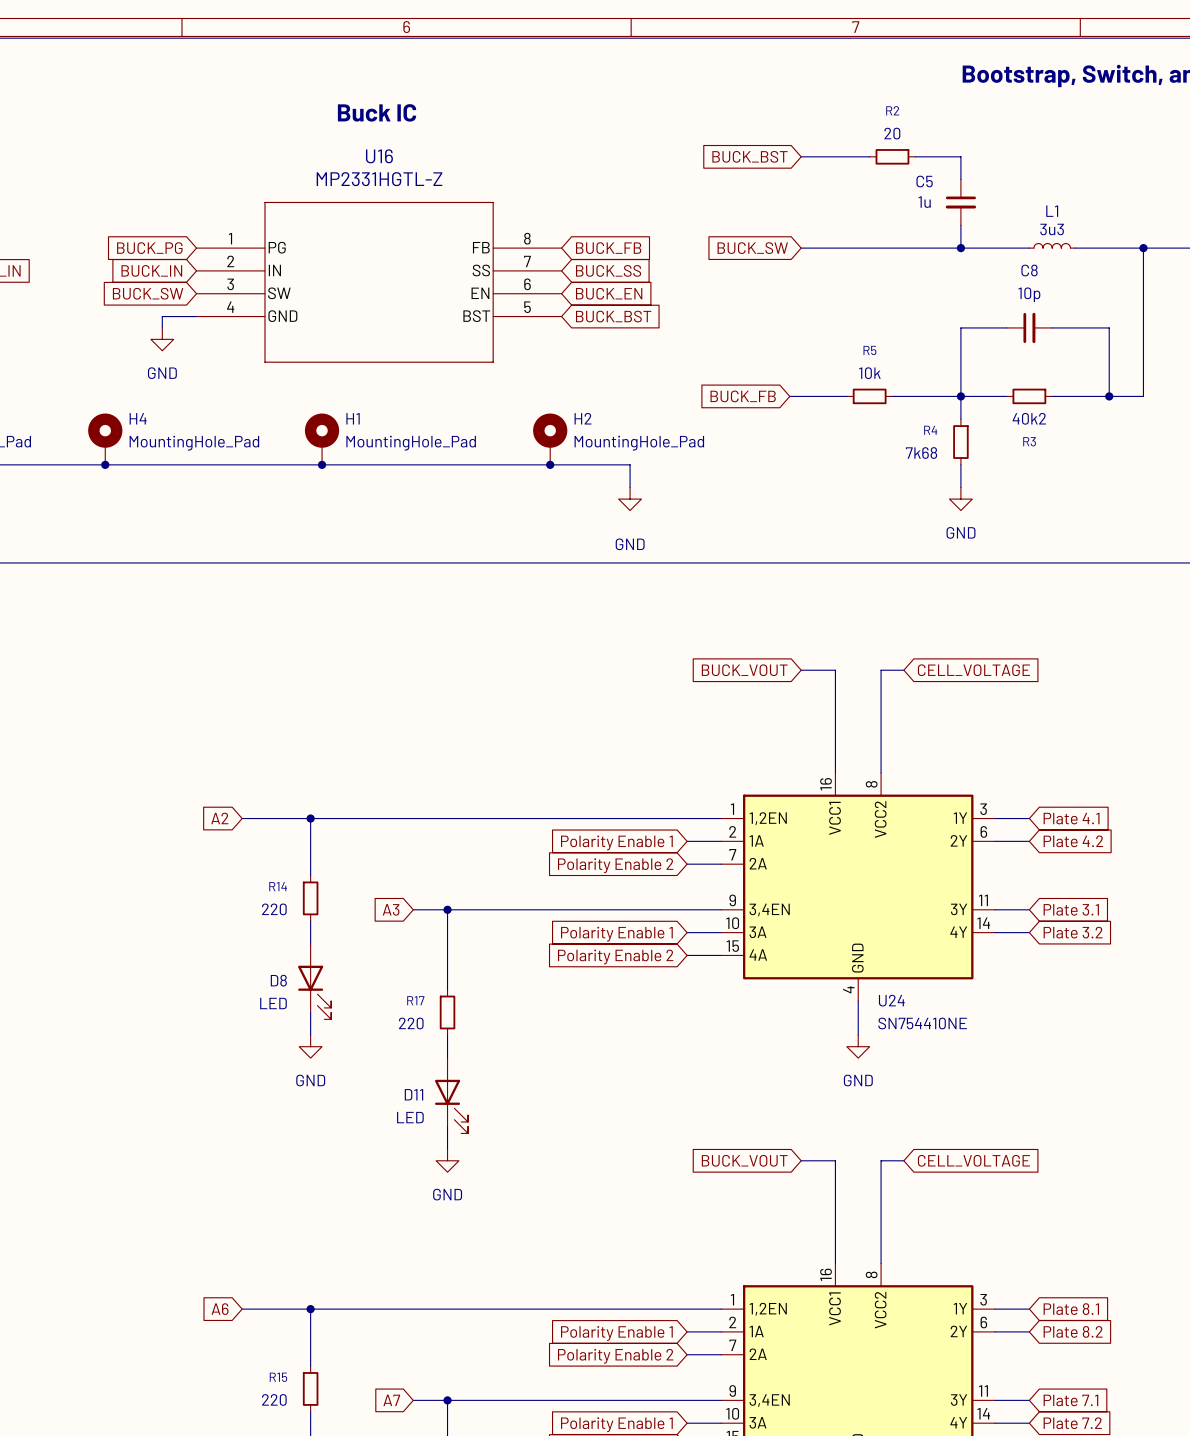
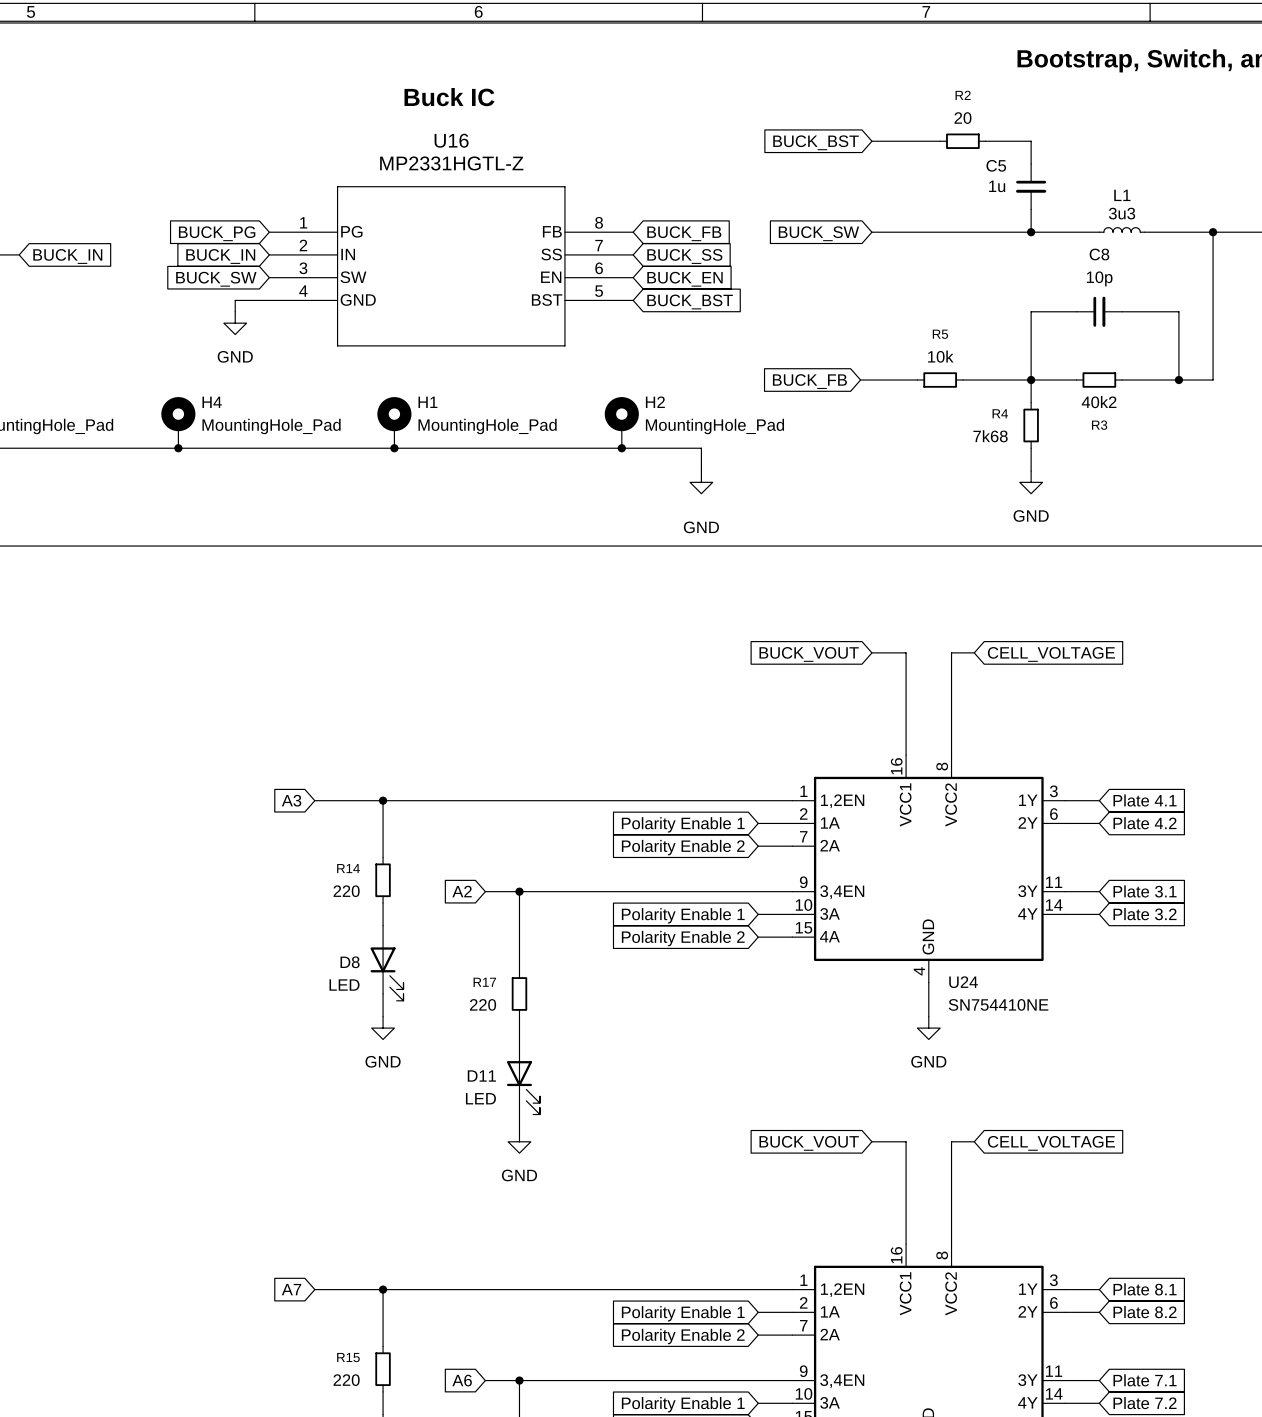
global label: A2 (219, 818) -> A3 (291, 800)
global label: A3 (391, 909) -> A2 (462, 891)
global label: A6 (220, 1309) -> A7 (291, 1289)
global label: A7 (391, 1400) -> A6 (462, 1380)

